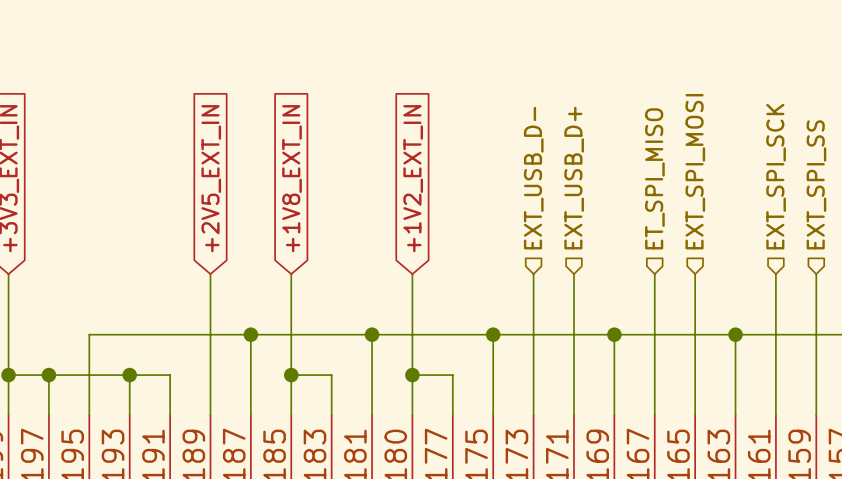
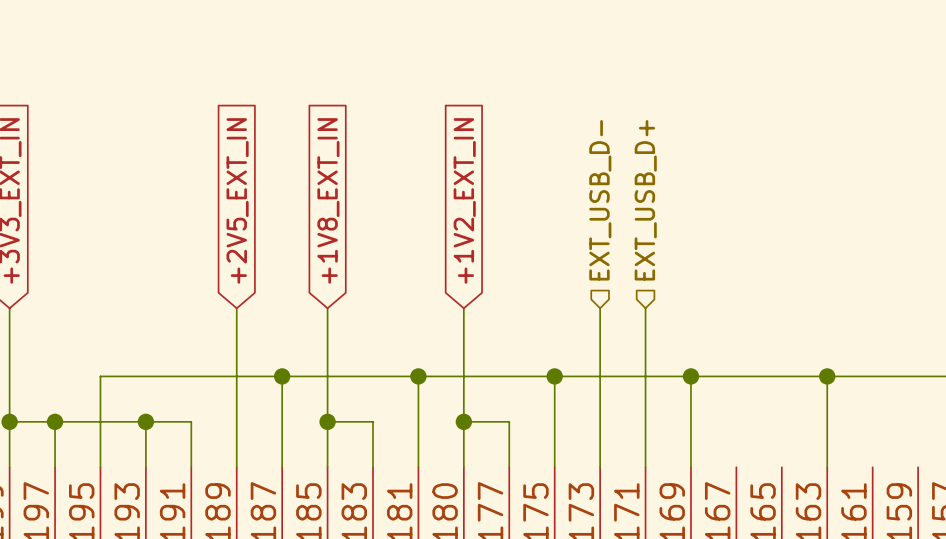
hierarchical label: EXT_SPI_MOSI (695, 171) -> none
hierarchical label: EXT_SPI_SCK (776, 176) -> none
hierarchical label: ET_SPI_MISO (654, 178) -> none
hierarchical label: EXT_SPI_SS (816, 184) -> none
wire: (654, 274) (654, 415) -> none
wire: (695, 274) (695, 415) -> none
wire: (775, 274) (775, 415) -> none
wire: (816, 274) (816, 415) -> none

